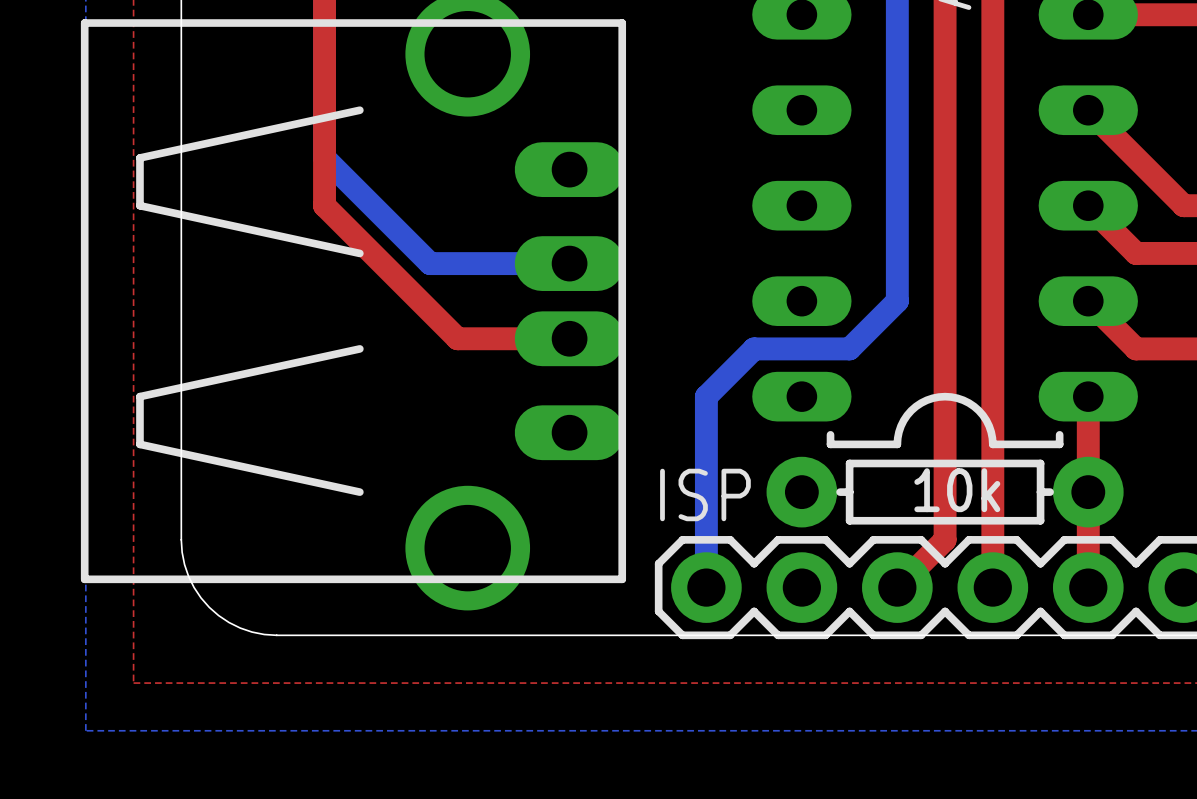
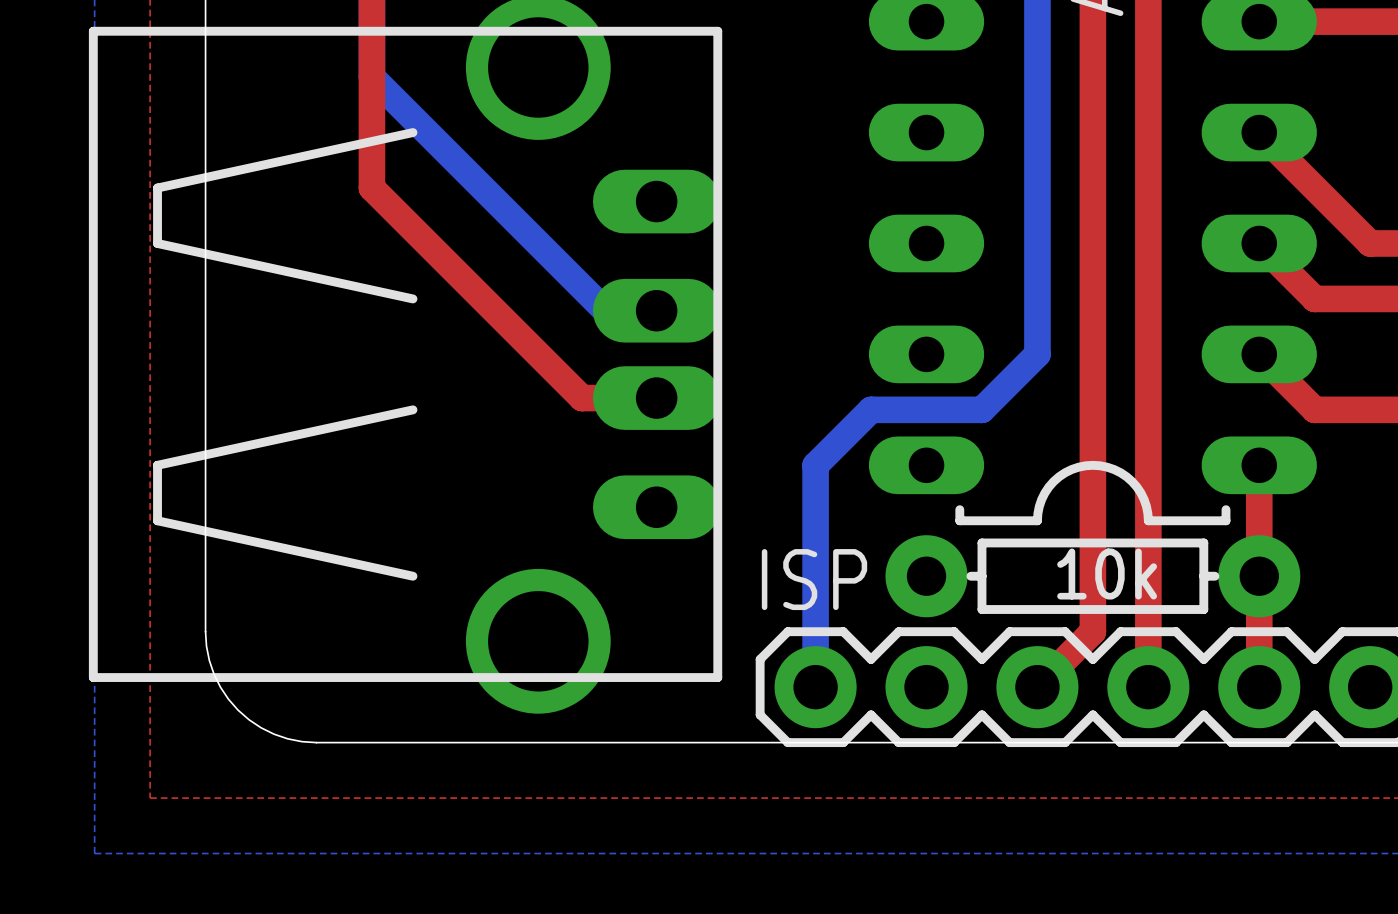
bottom track: (324, 62) (324, 157) (430, 263) (525, 263) -> (371, 77) (605, 310)
top track: (324, 157) (324, 205) (457, 338) (505, 338) -> (371, 188) (581, 398)

